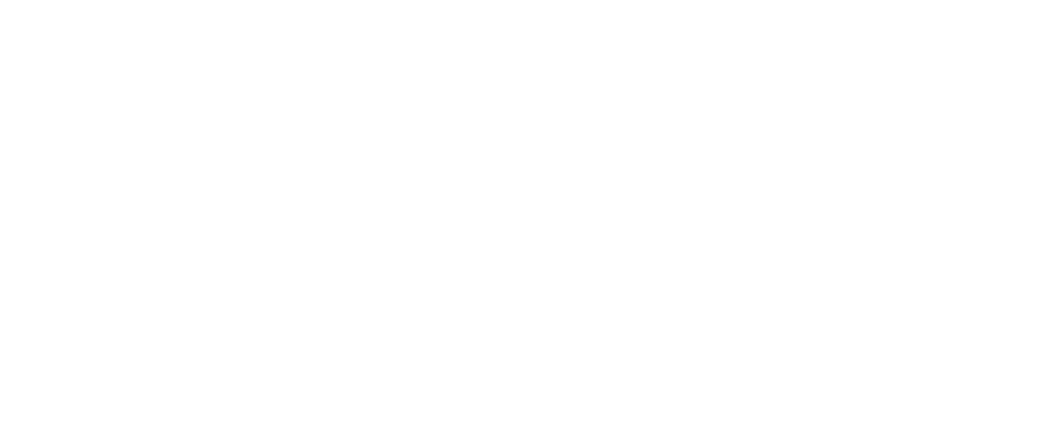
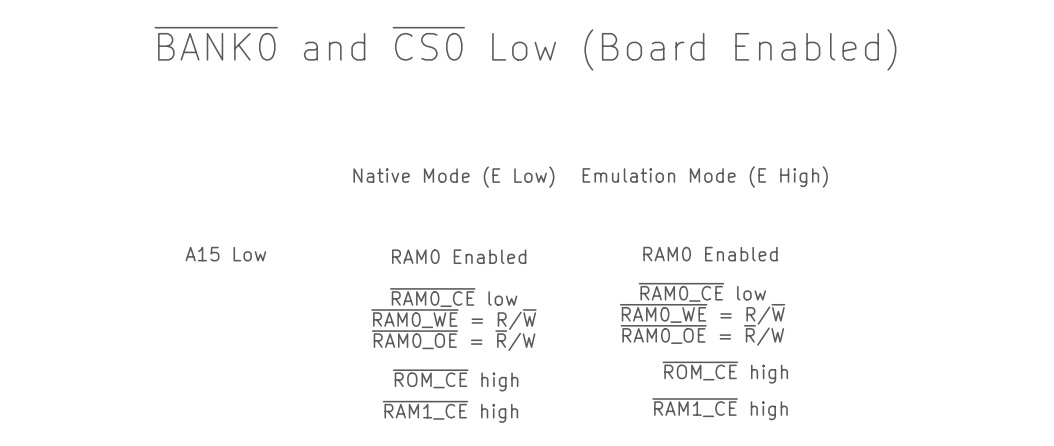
text: none -> ~{BANK0} and ~{CS0} Low (Board Enabled) (525, 48)
text: none -> Emulation Mode (E High) (705, 176)
text: none -> Native Mode (E Low) (453, 177)
text: none -> A15 Low (225, 254)
text: none -> RAM0 Enabled (710, 254)
text: none -> RAM0 Enabled (459, 256)
text: none -> ~{RAM0_CE} low (702, 292)
text: none -> ~{RAM0_CE} low (453, 297)
text: none -> ~{RAM0_WE} = R/~{W} (702, 314)
text: none -> ~{RAM0_WE} = R/~{W} (453, 319)
text: none -> ~{RAM0_OE} = ~{R}/W (702, 335)
text: none -> ~{RAM0_OE} = ~{R}/W (453, 340)
text: none -> ~{ROM_CE} high (725, 372)
text: none -> ~{ROM_CE} high (455, 380)
text: none -> ~{RAM1_CE} high (720, 409)
text: none -> ~{RAM1_CE} high (450, 411)

